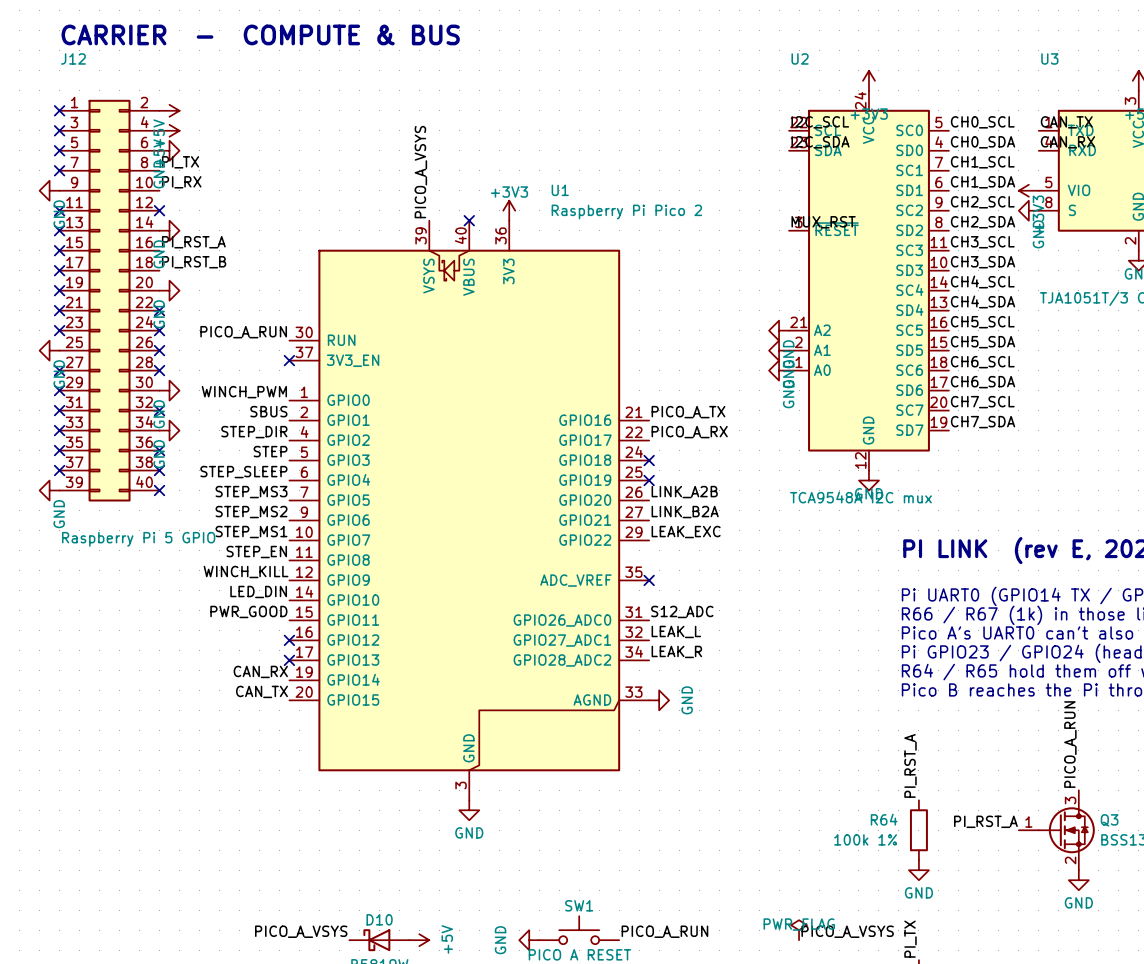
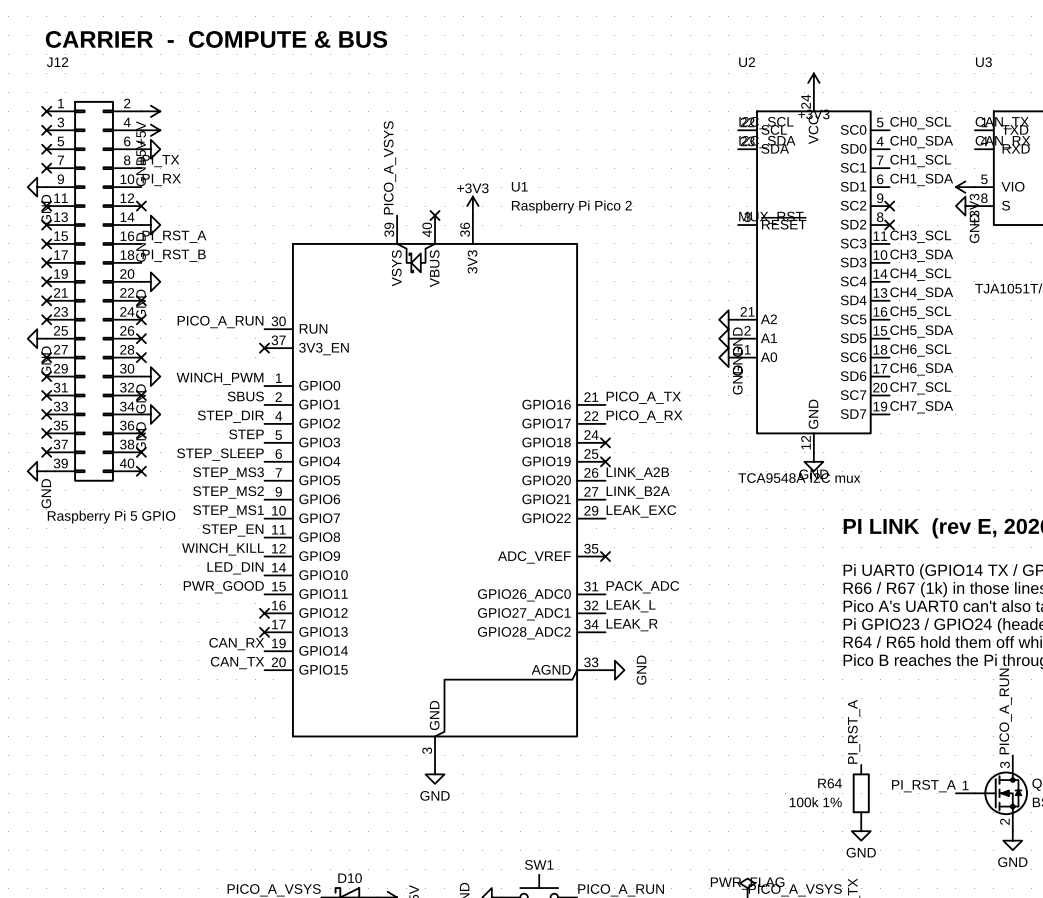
label: CH2_SCL (982, 202) -> none
no-connect mark: none -> (889, 206)
label: CH2_SDA (983, 222) -> none
no-connect mark: none -> (889, 225)
label: S12_ADC (682, 611) -> PACK_ADC (642, 587)

